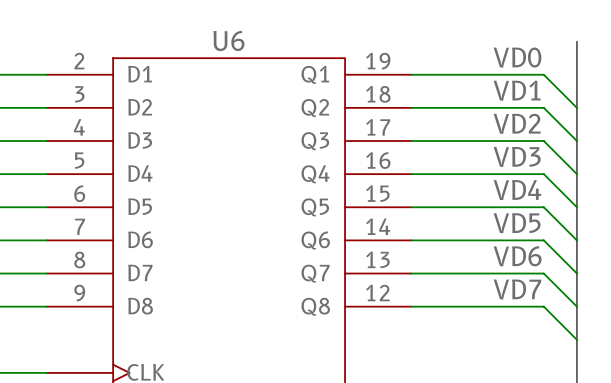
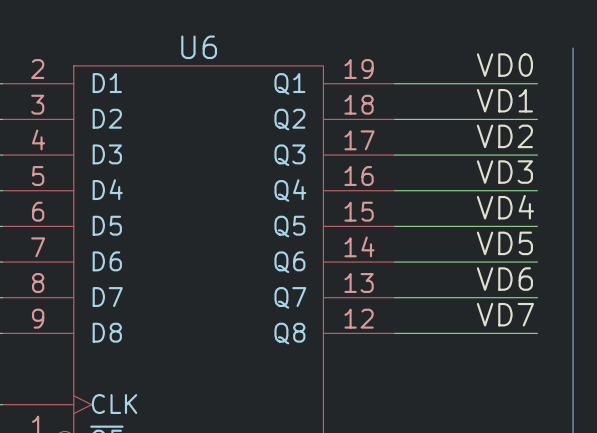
wire: (543, 74) (576, 107) -> none
wire: (543, 107) (576, 141) -> none
wire: (543, 141) (576, 174) -> none
wire: (543, 174) (576, 207) -> none
wire: (543, 207) (576, 240) -> none
wire: (543, 240) (576, 273) -> none
wire: (543, 273) (576, 306) -> none
wire: (543, 306) (576, 339) -> none

